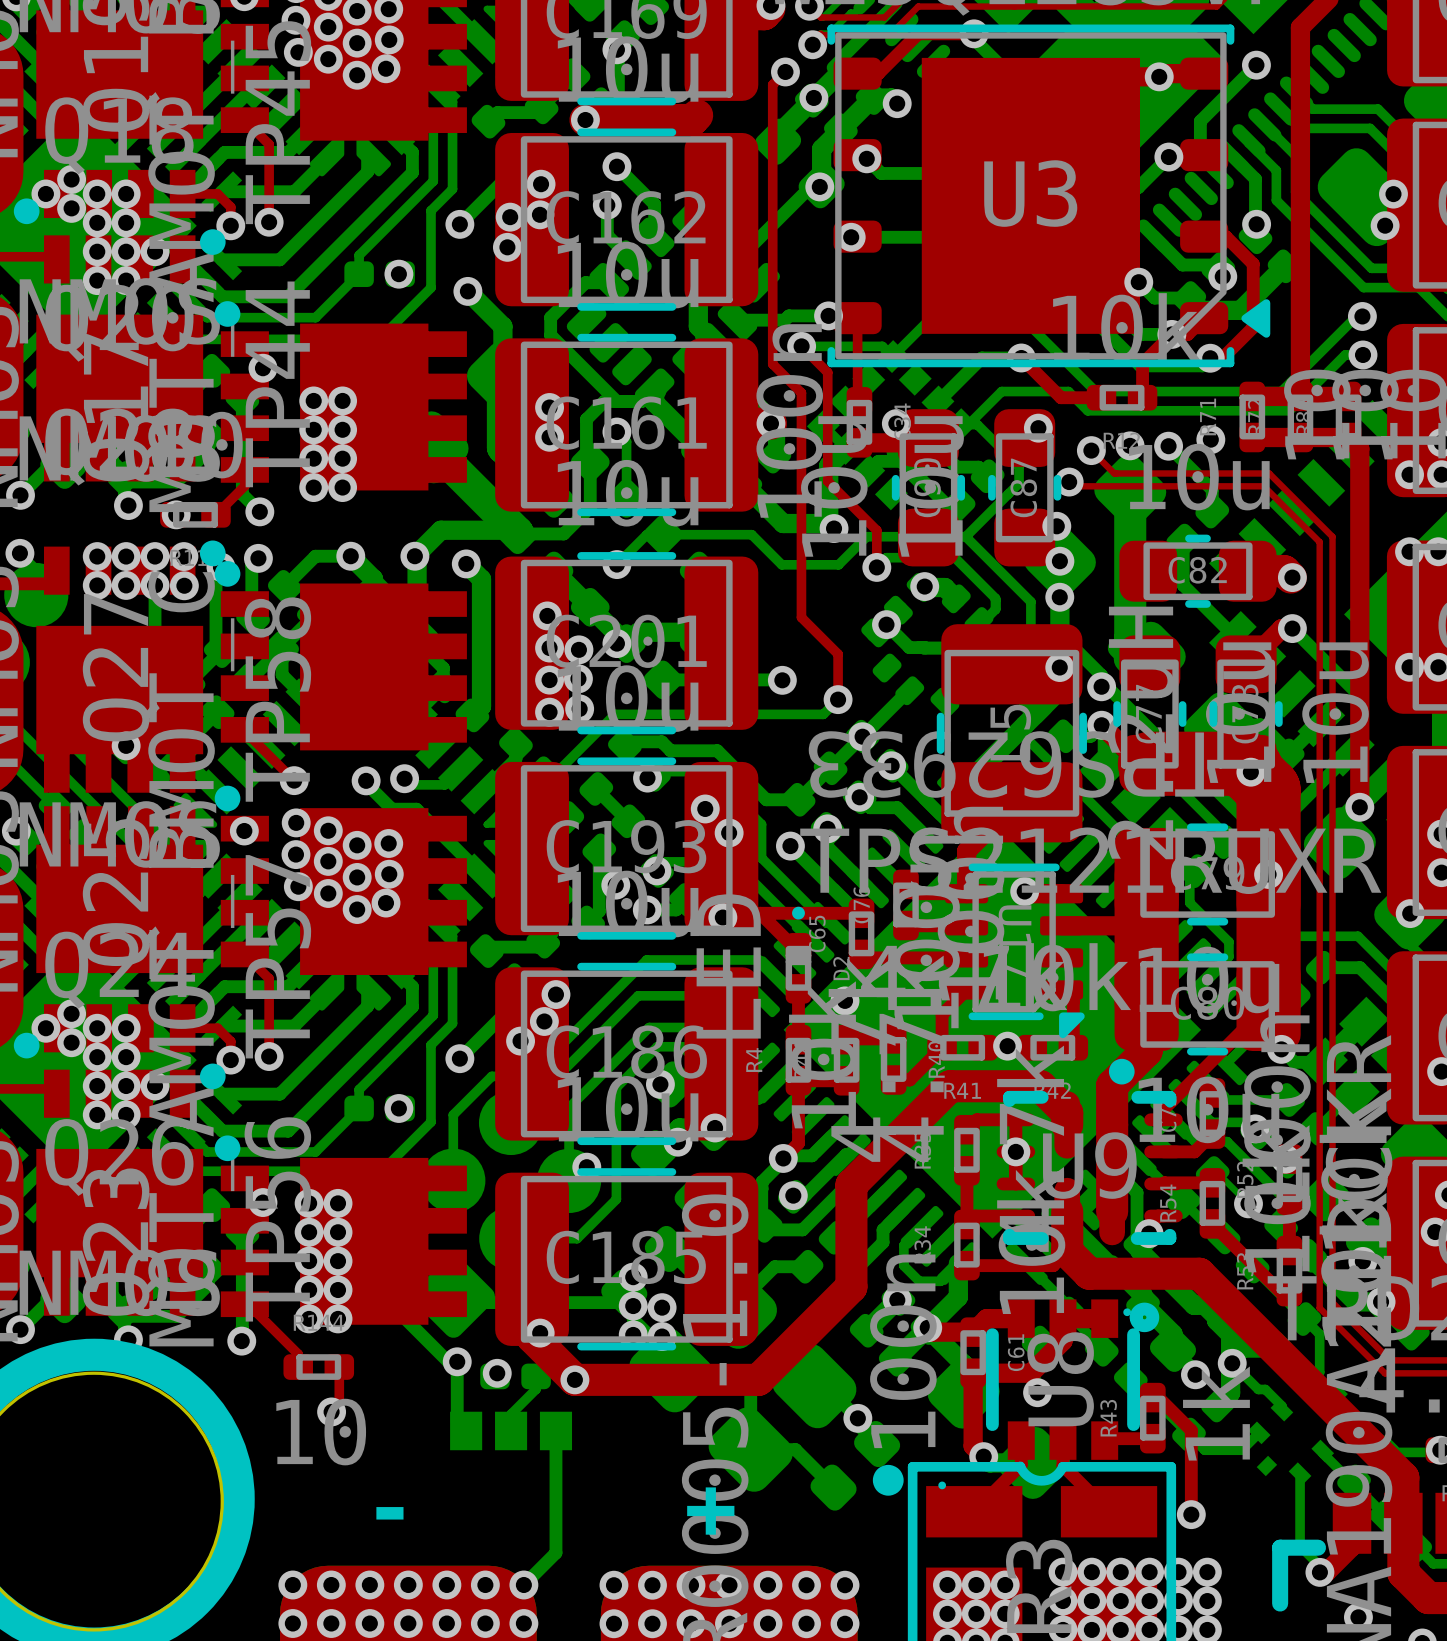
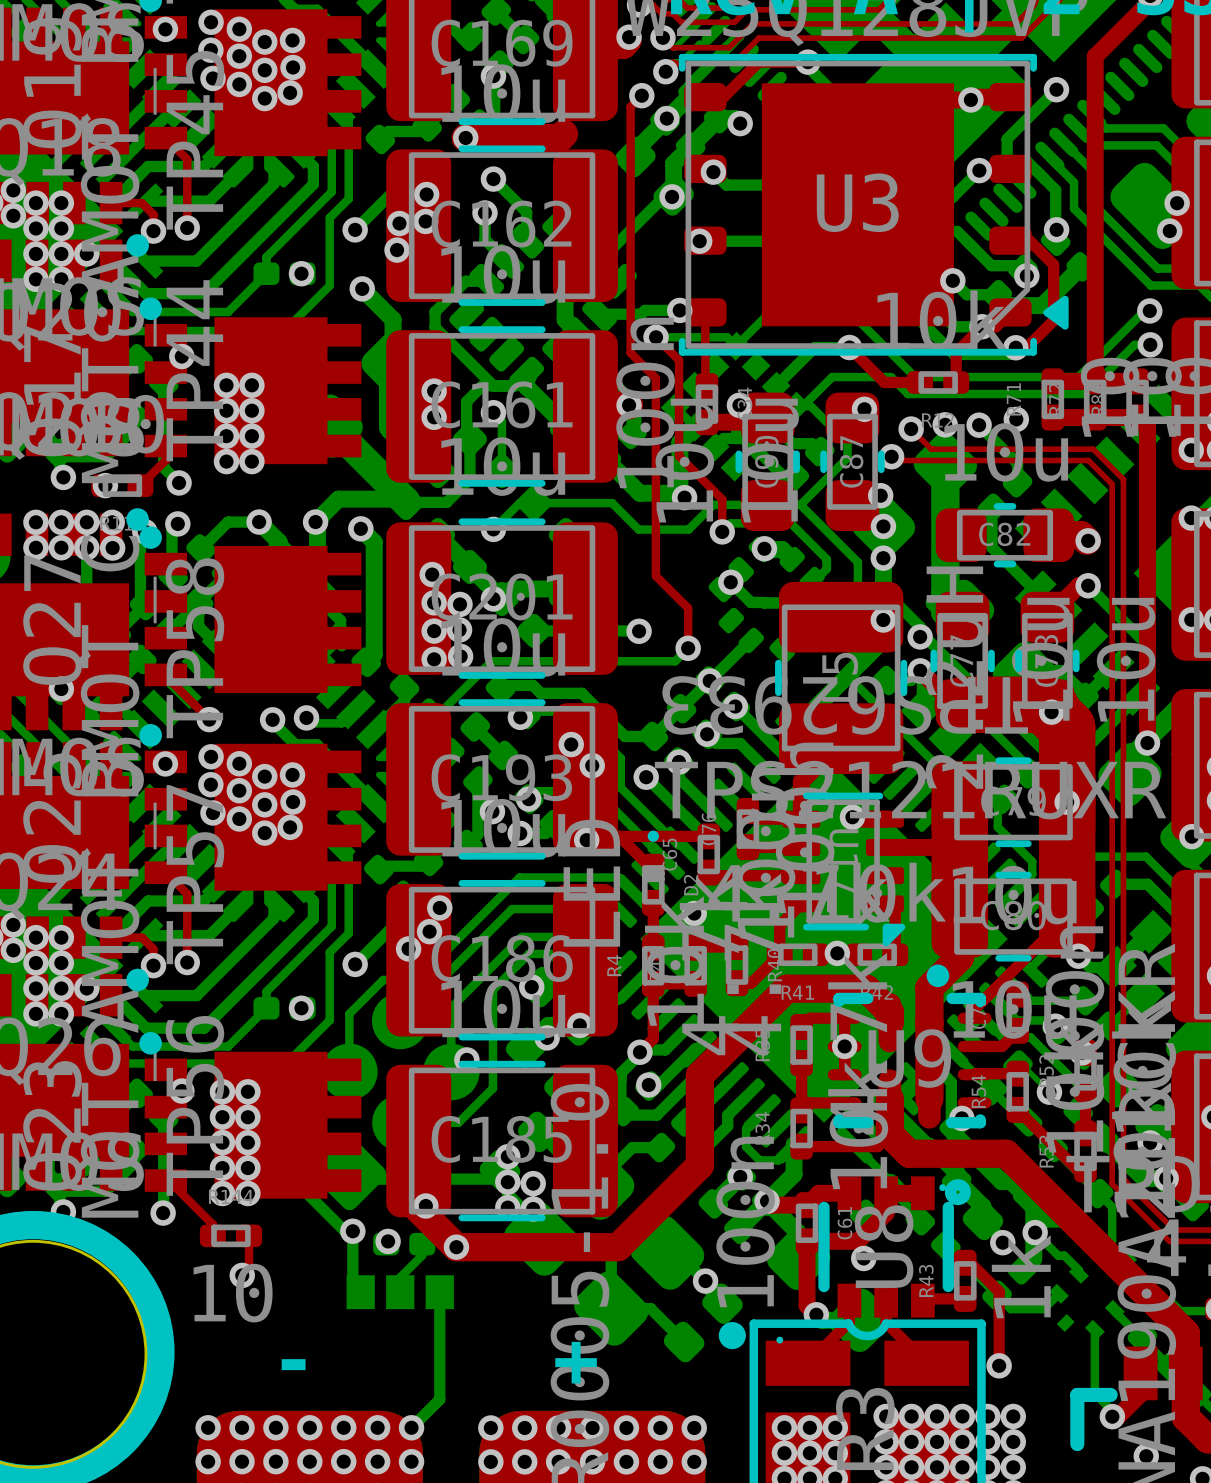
top track: (1269, 473) (1332, 536) -> (1067, 449) (1093, 449) (1123, 479) (1123, 504)
top track: (1263, 486) (1319, 542) -> (1063, 460) (1088, 460) (1112, 484) (1112, 509)

